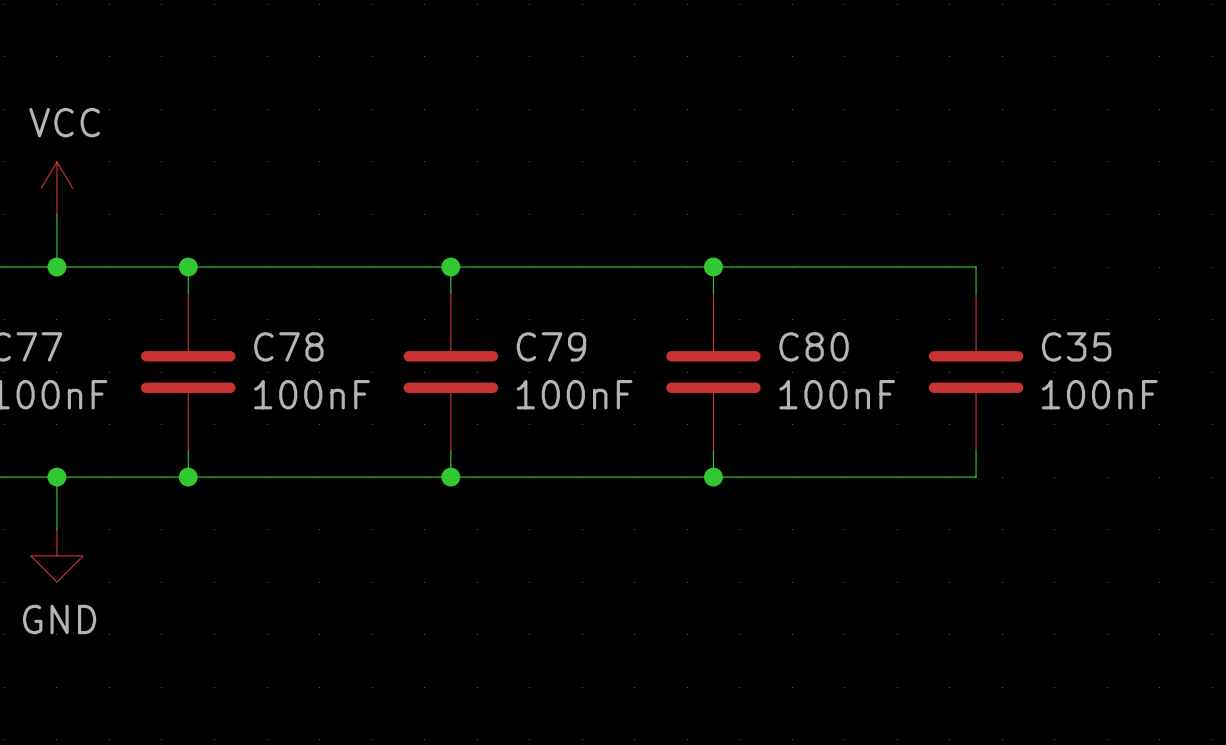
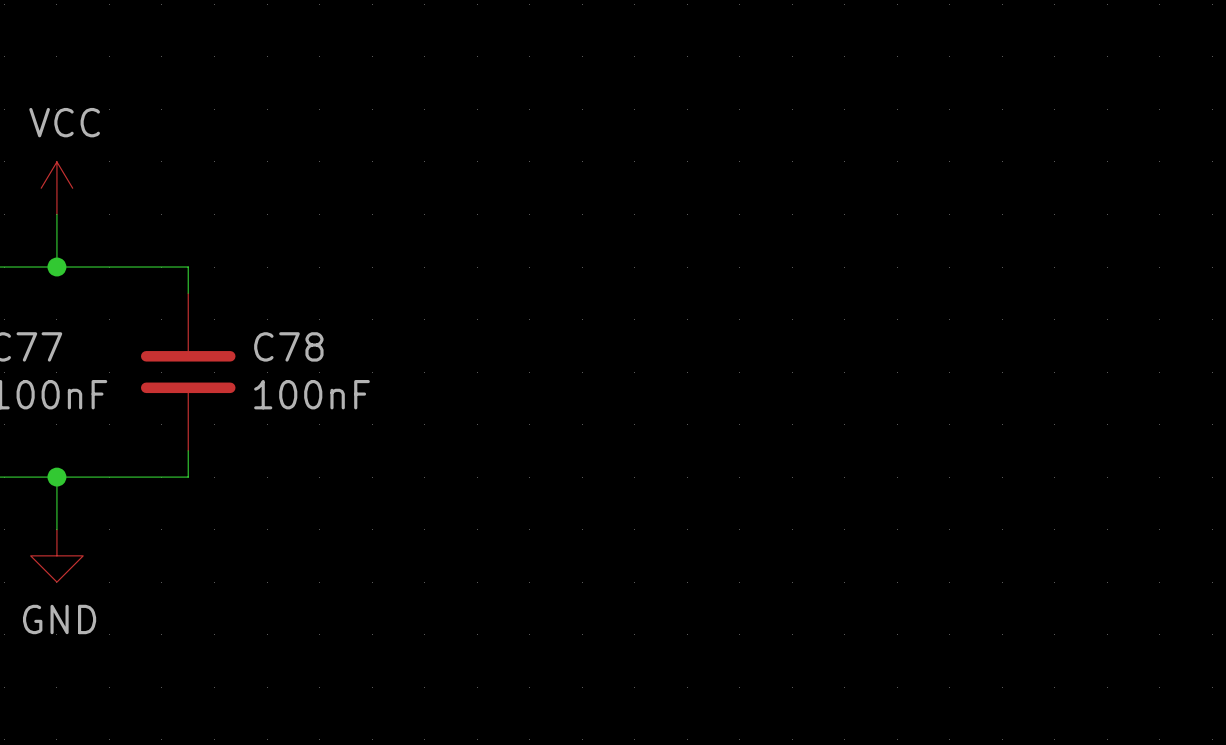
wire: (188, 267) (976, 267) (976, 293) -> none
junction: (188, 267) -> none
wire: (450, 267) (450, 293) -> none
junction: (450, 267) -> none
wire: (713, 267) (713, 293) -> none
junction: (713, 267) -> none
C79: 100nF (450, 372) -> none
C80: 100nF (713, 372) -> none
C35: 100nF (976, 372) -> none
wire: (450, 450) (450, 477) -> none
wire: (713, 450) (713, 477) -> none
wire: (976, 450) (976, 477) (188, 477) -> none
junction: (188, 477) -> none
junction: (450, 477) -> none
junction: (713, 477) -> none

